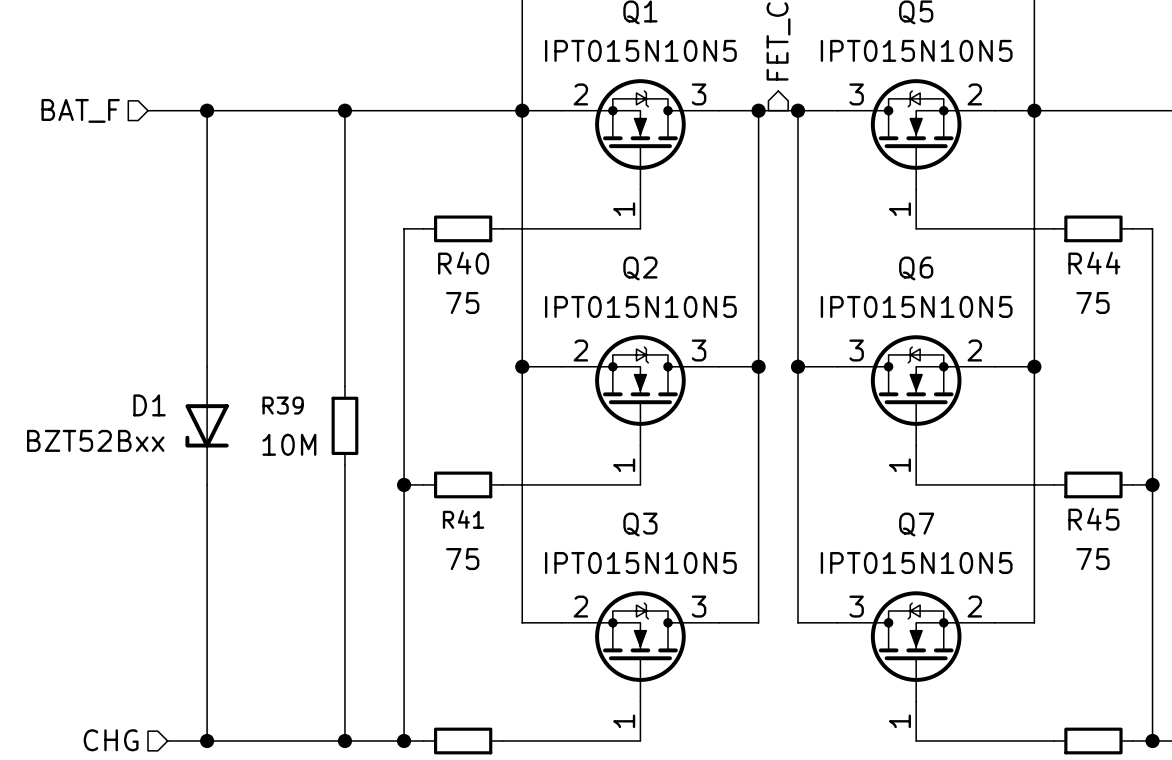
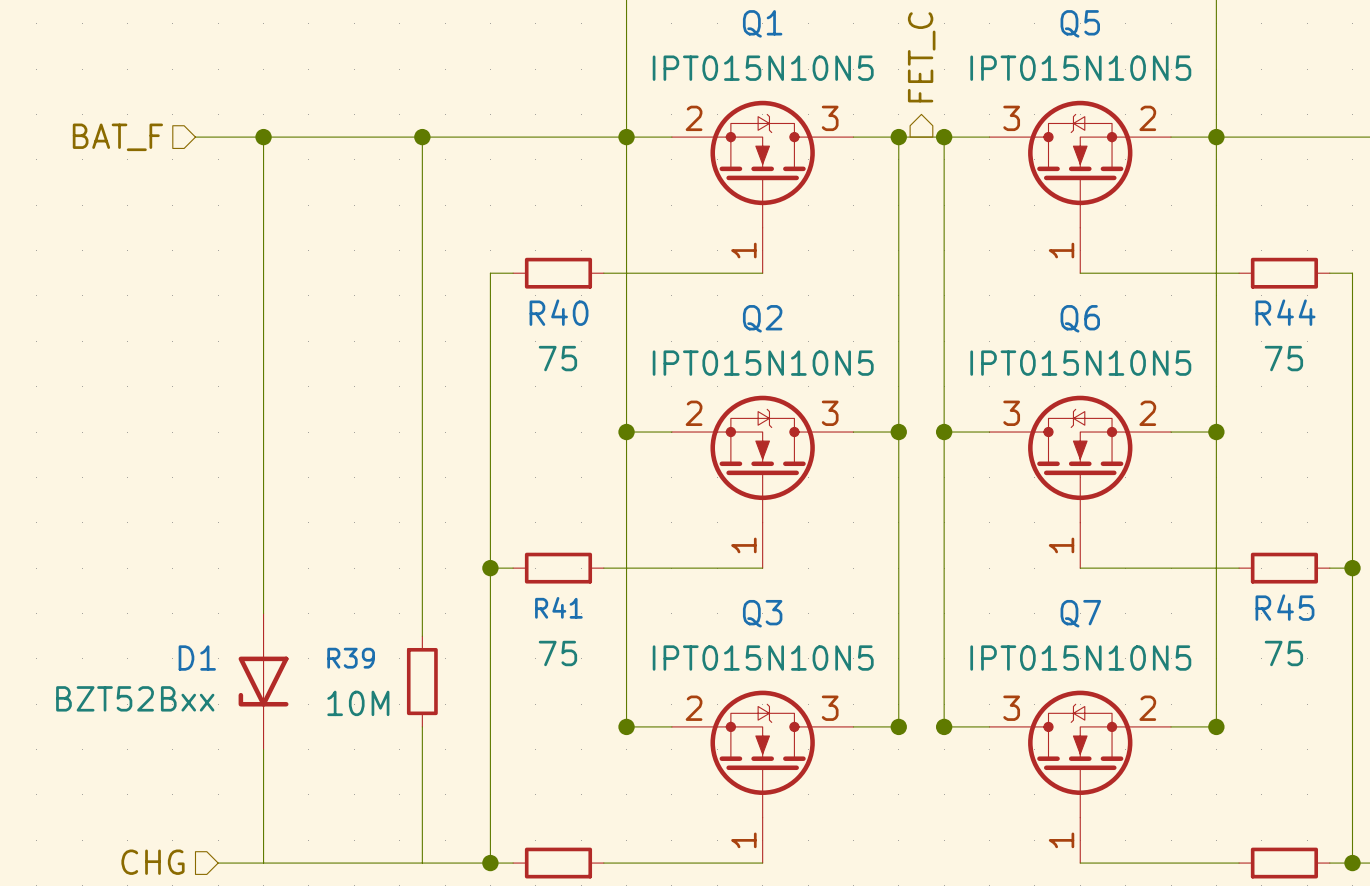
D1 position: (207, 425) -> (263, 681)
R39 position: (344, 425) -> (422, 681)
wire: (344, 544) (344, 622) -> (422, 454) (422, 545)
junction: none -> (626, 726)
junction: none -> (898, 726)
junction: none -> (944, 726)
junction: none -> (1216, 726)
junction: (207, 741) -> none
junction: (344, 741) -> none

